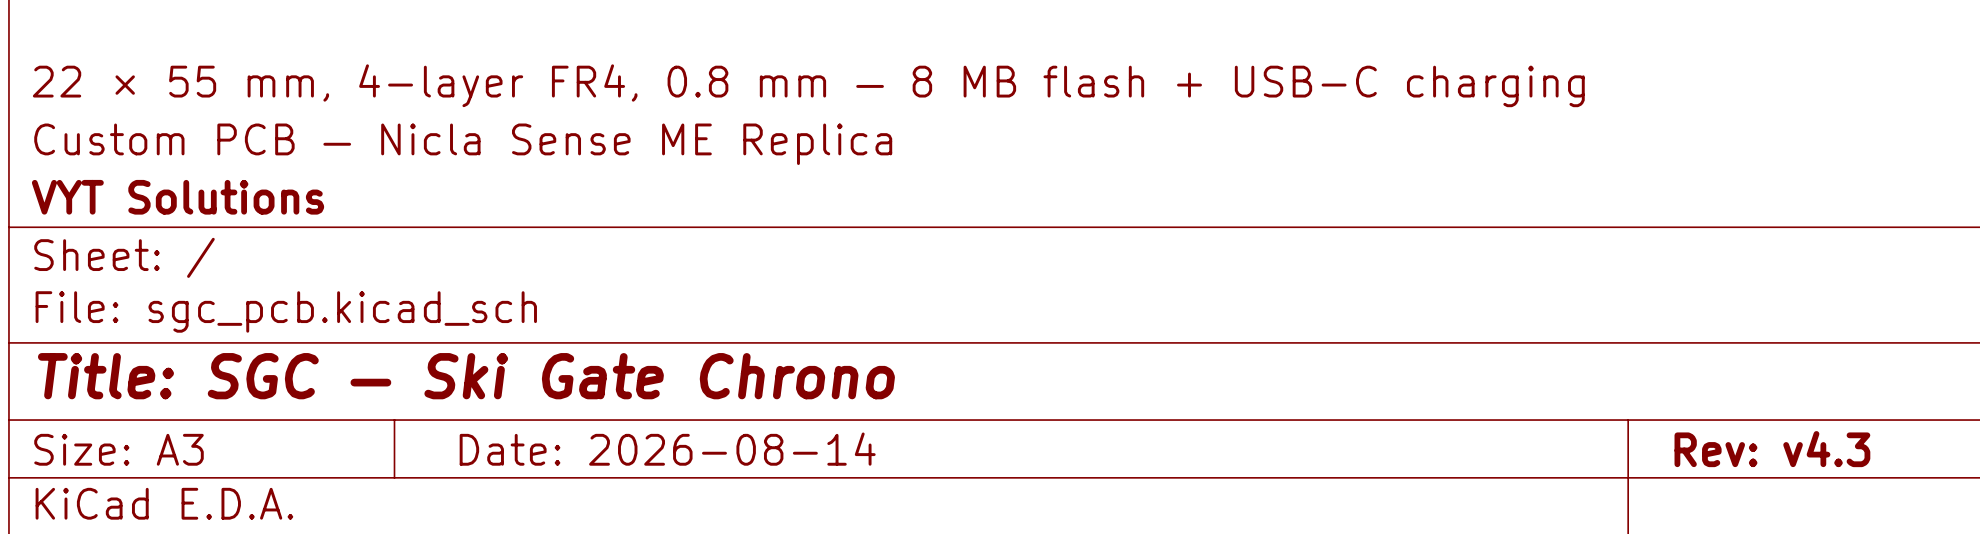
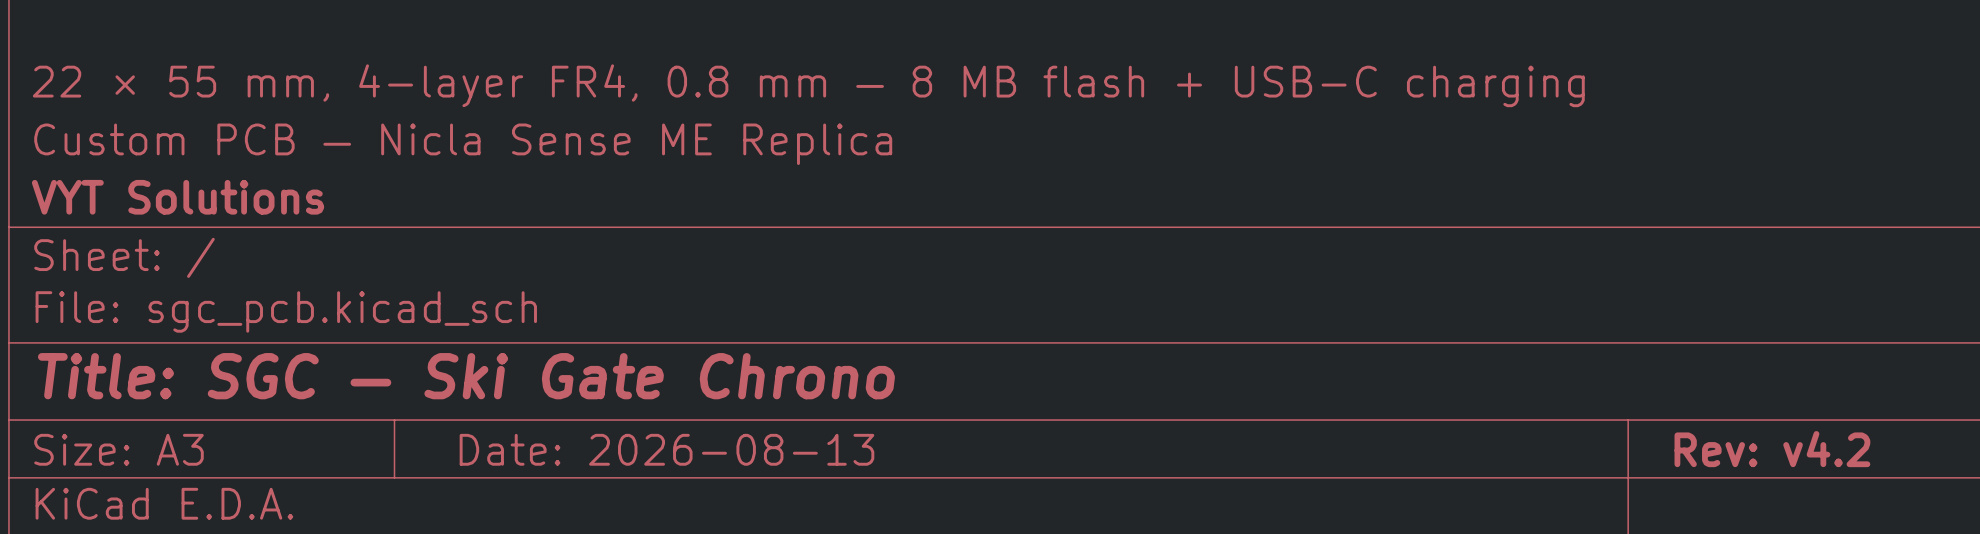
title block: Date: 2026-08-14 (667, 449) -> Date: 2026-08-13 (666, 449)
title block: Rev: v4.3 (1772, 449) -> Rev: v4.2 (1772, 449)

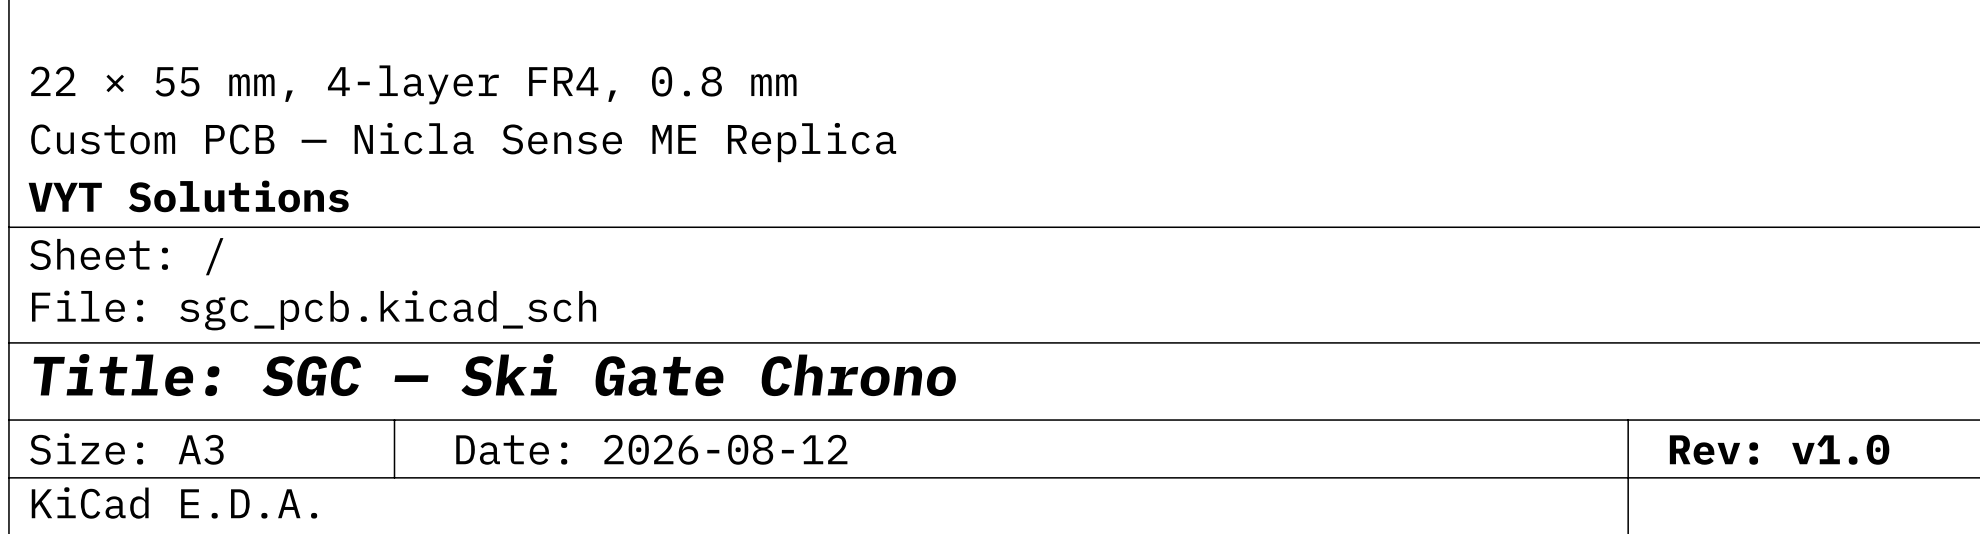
title block: 22 × 55 mm, 4-layer FR4, 0.8 mm — 8 MB flash + USB-C charging (808, 85) -> 22 × 55 mm, 4-layer FR4, 0.8 mm (413, 84)
title block: Date: 2026-08-13 (666, 449) -> Date: 2026-08-12 (651, 449)
title block: Rev: v4.2 (1772, 449) -> Rev: v1.0 (1779, 449)

